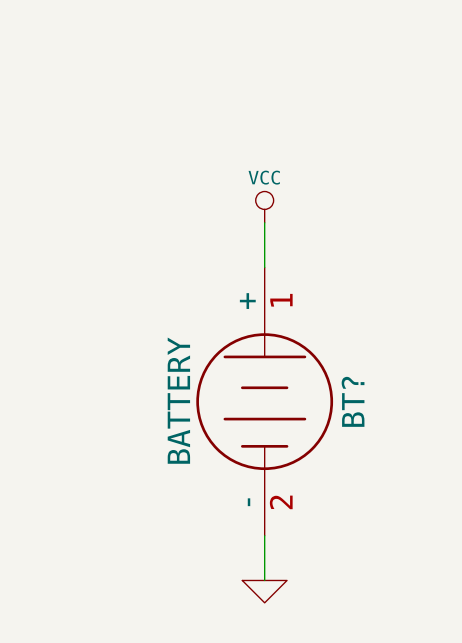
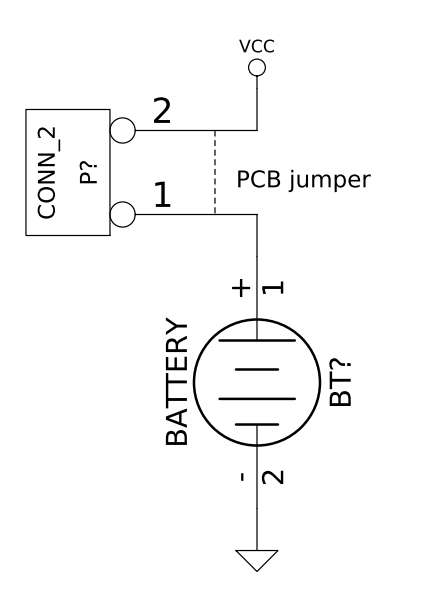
wire: none -> (256, 88) (256, 130) (214, 130)
line: none -> (214, 130) (214, 214)
P?: none -> CONN_2 (120, 172)
text: none -> PCB jumper (304, 180)
power symbol position: VCC (264, 207) -> VCC (256, 73)
wire: none -> (214, 214) (256, 214)

